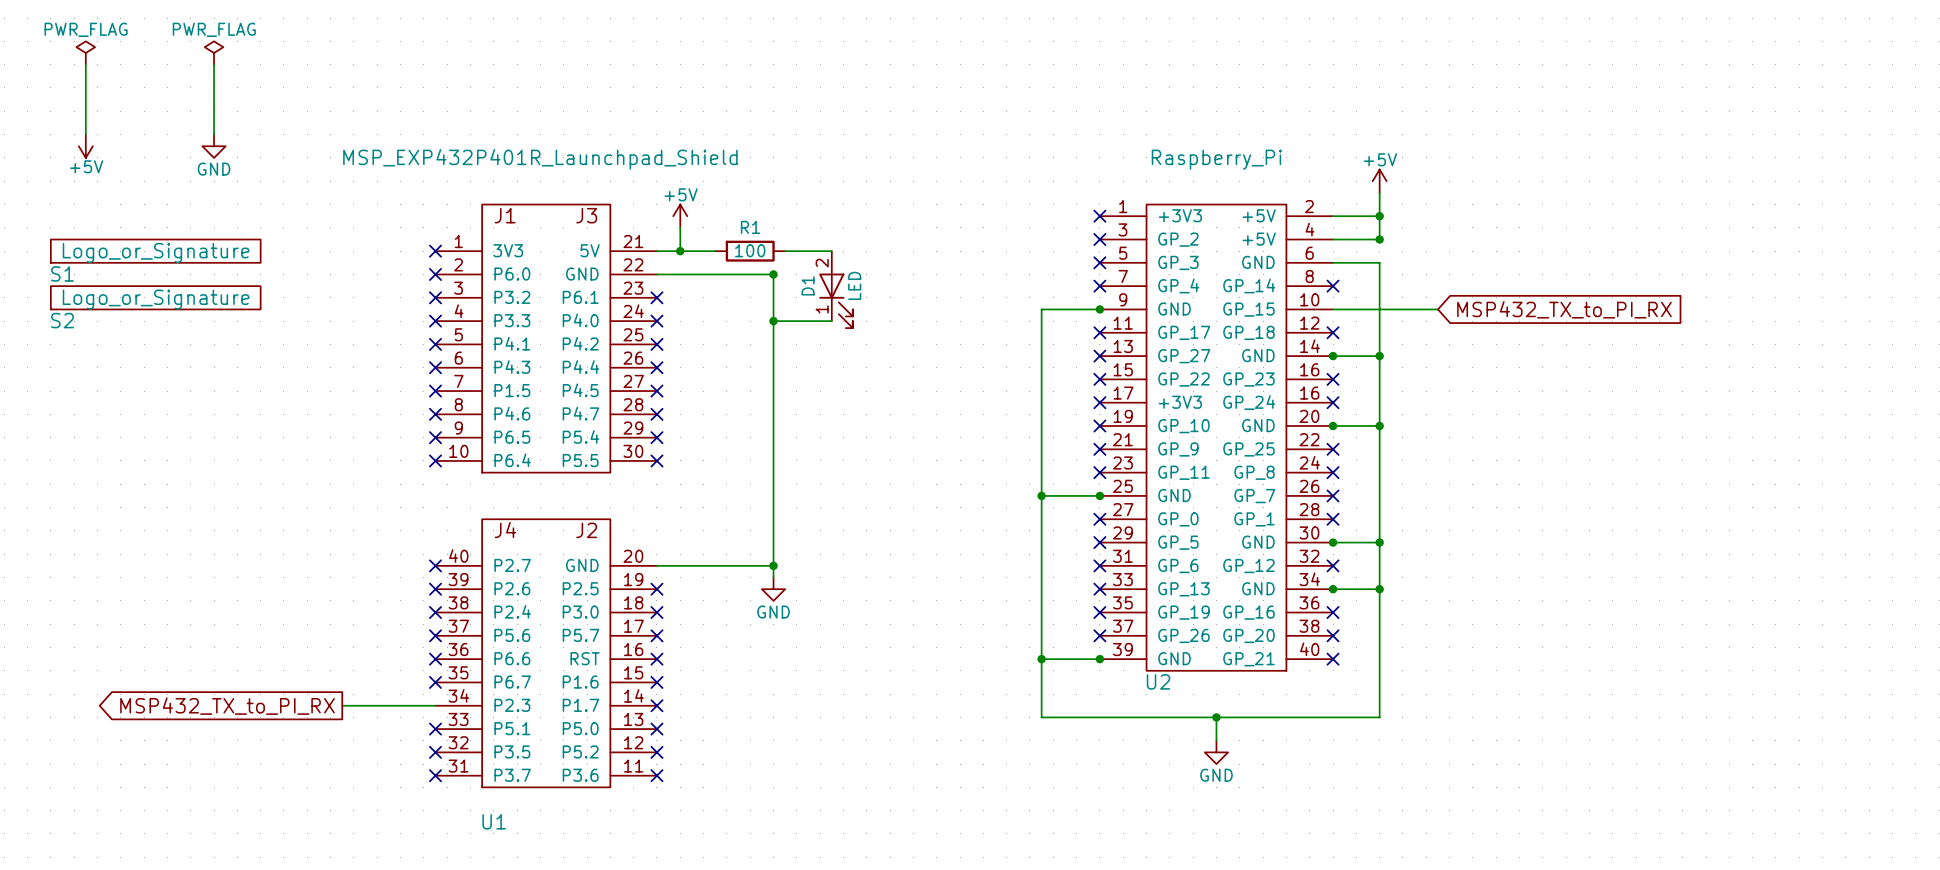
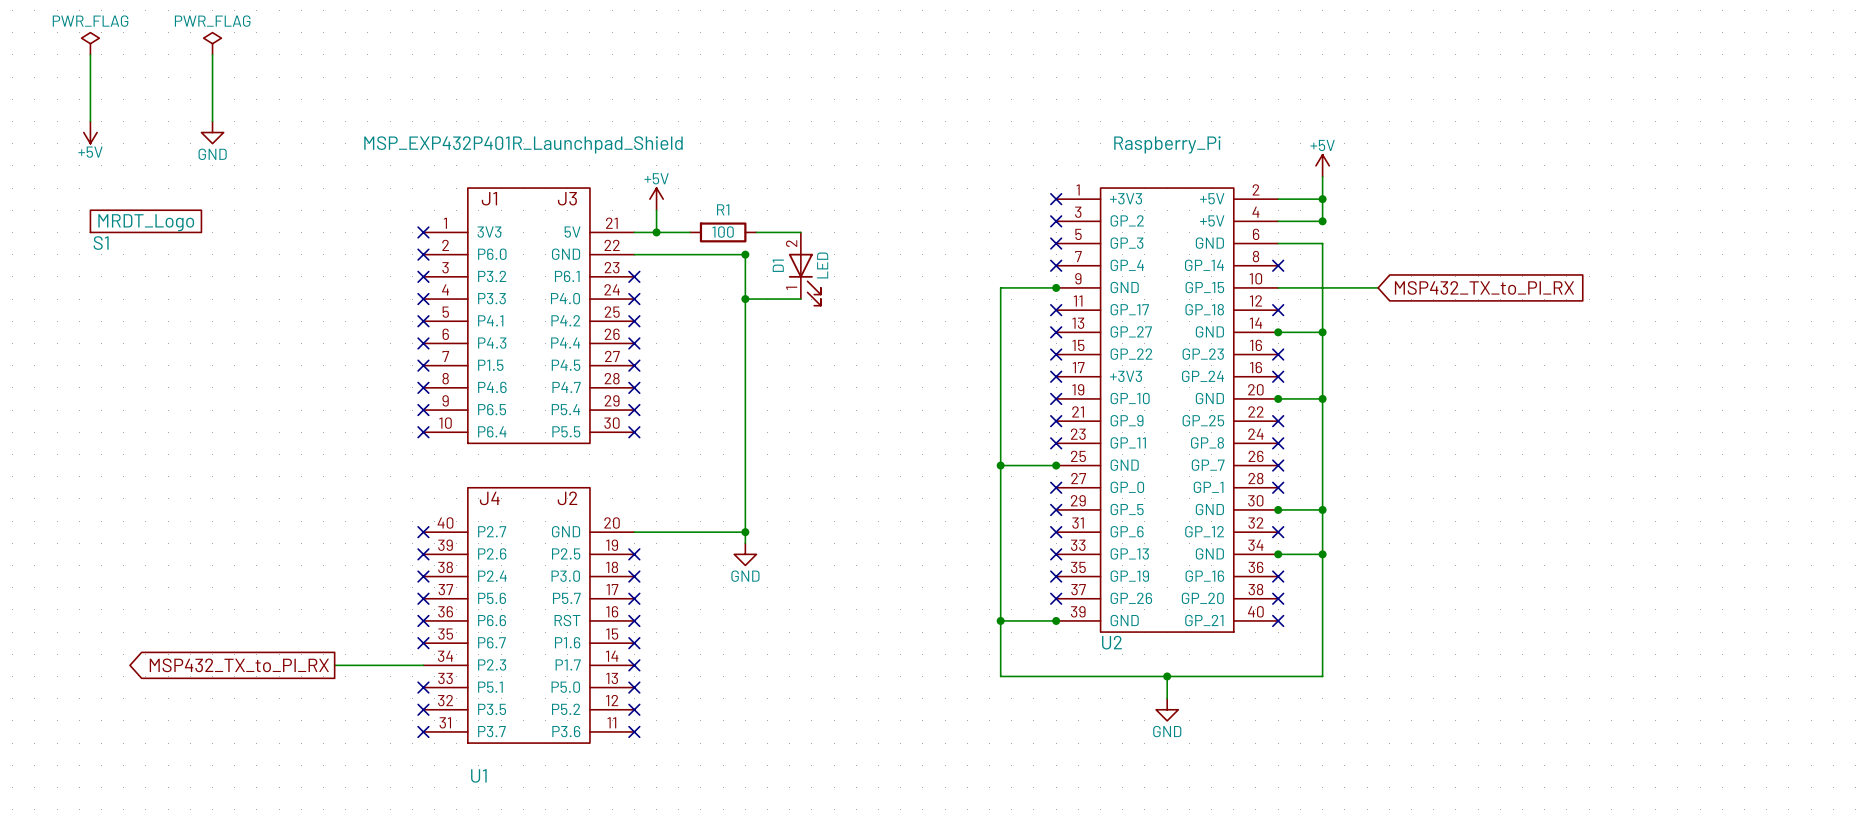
S1 symbol: [50, 239, 261, 263] -> [90, 210, 202, 233]
S1 value: Logo_or_Signature (156, 252) -> MRDT_Logo (146, 222)
S1 name position: S1 (62, 273) -> S1 (101, 243)
S2: Logo_or_Signature (155, 297) -> none

